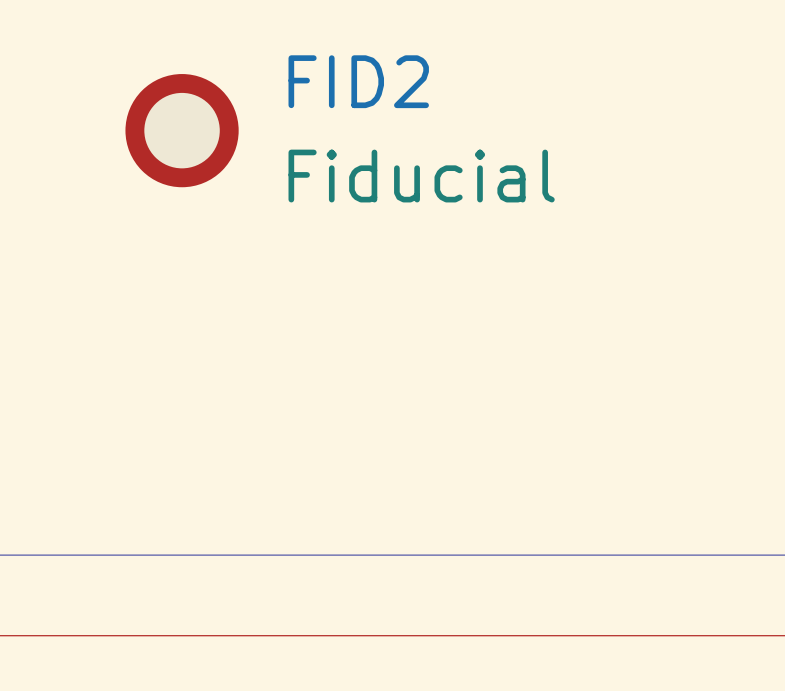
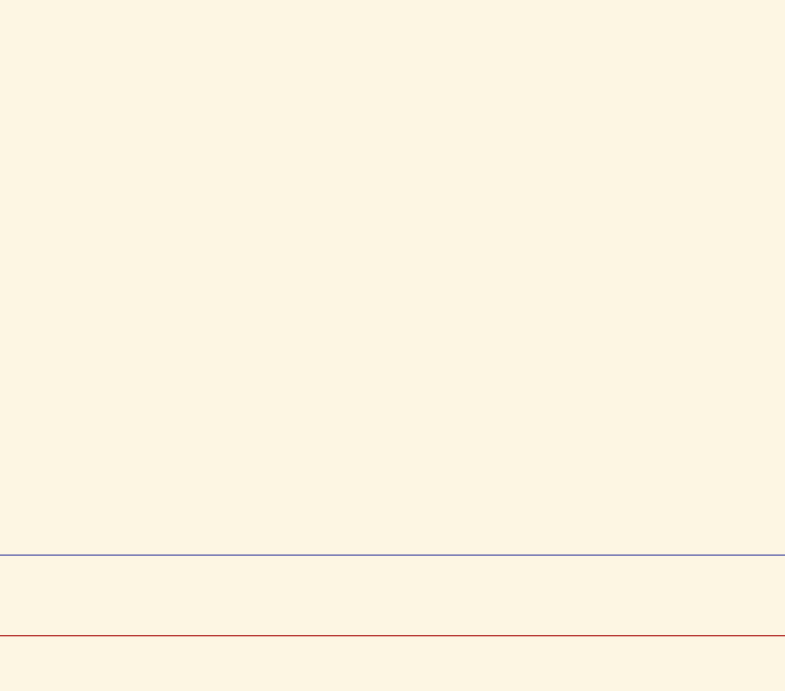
FID2: Fiducial (182, 130) -> none

